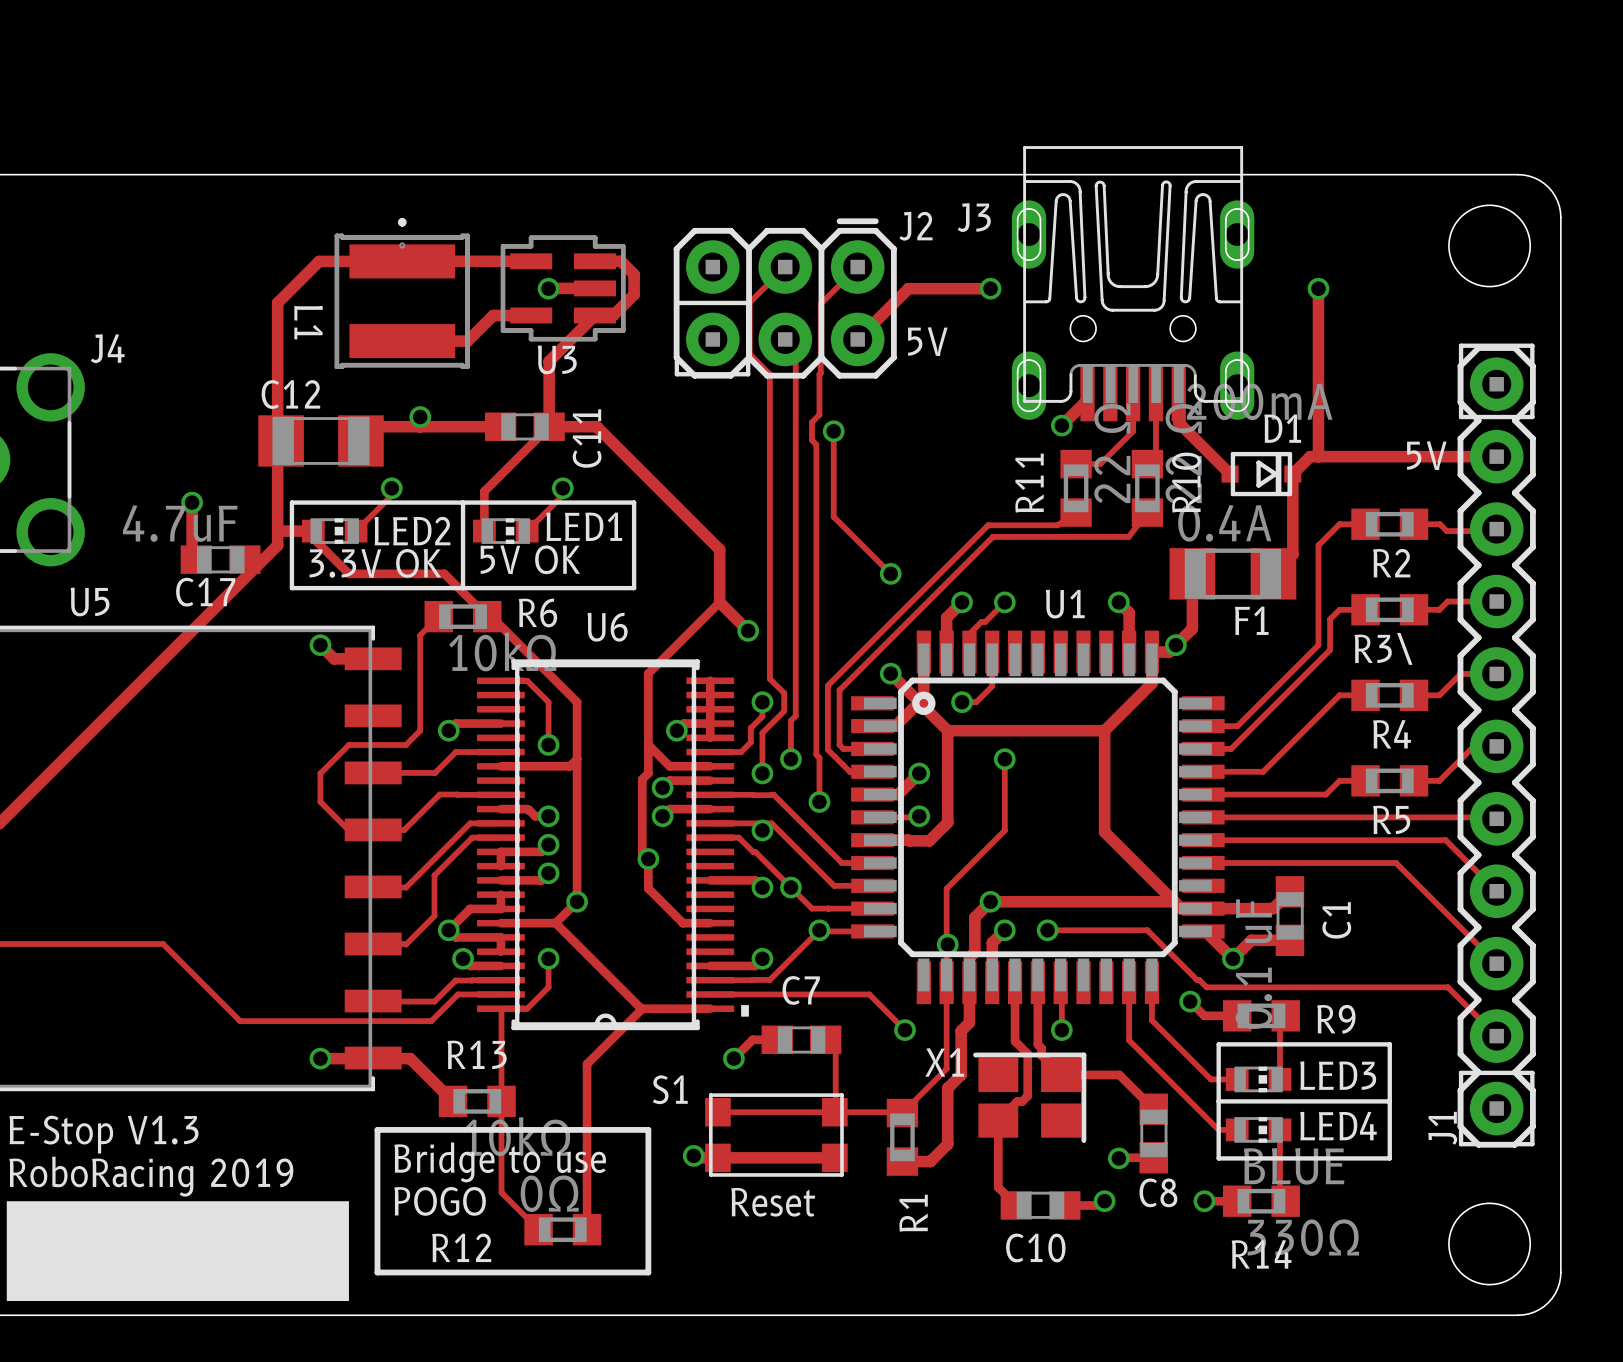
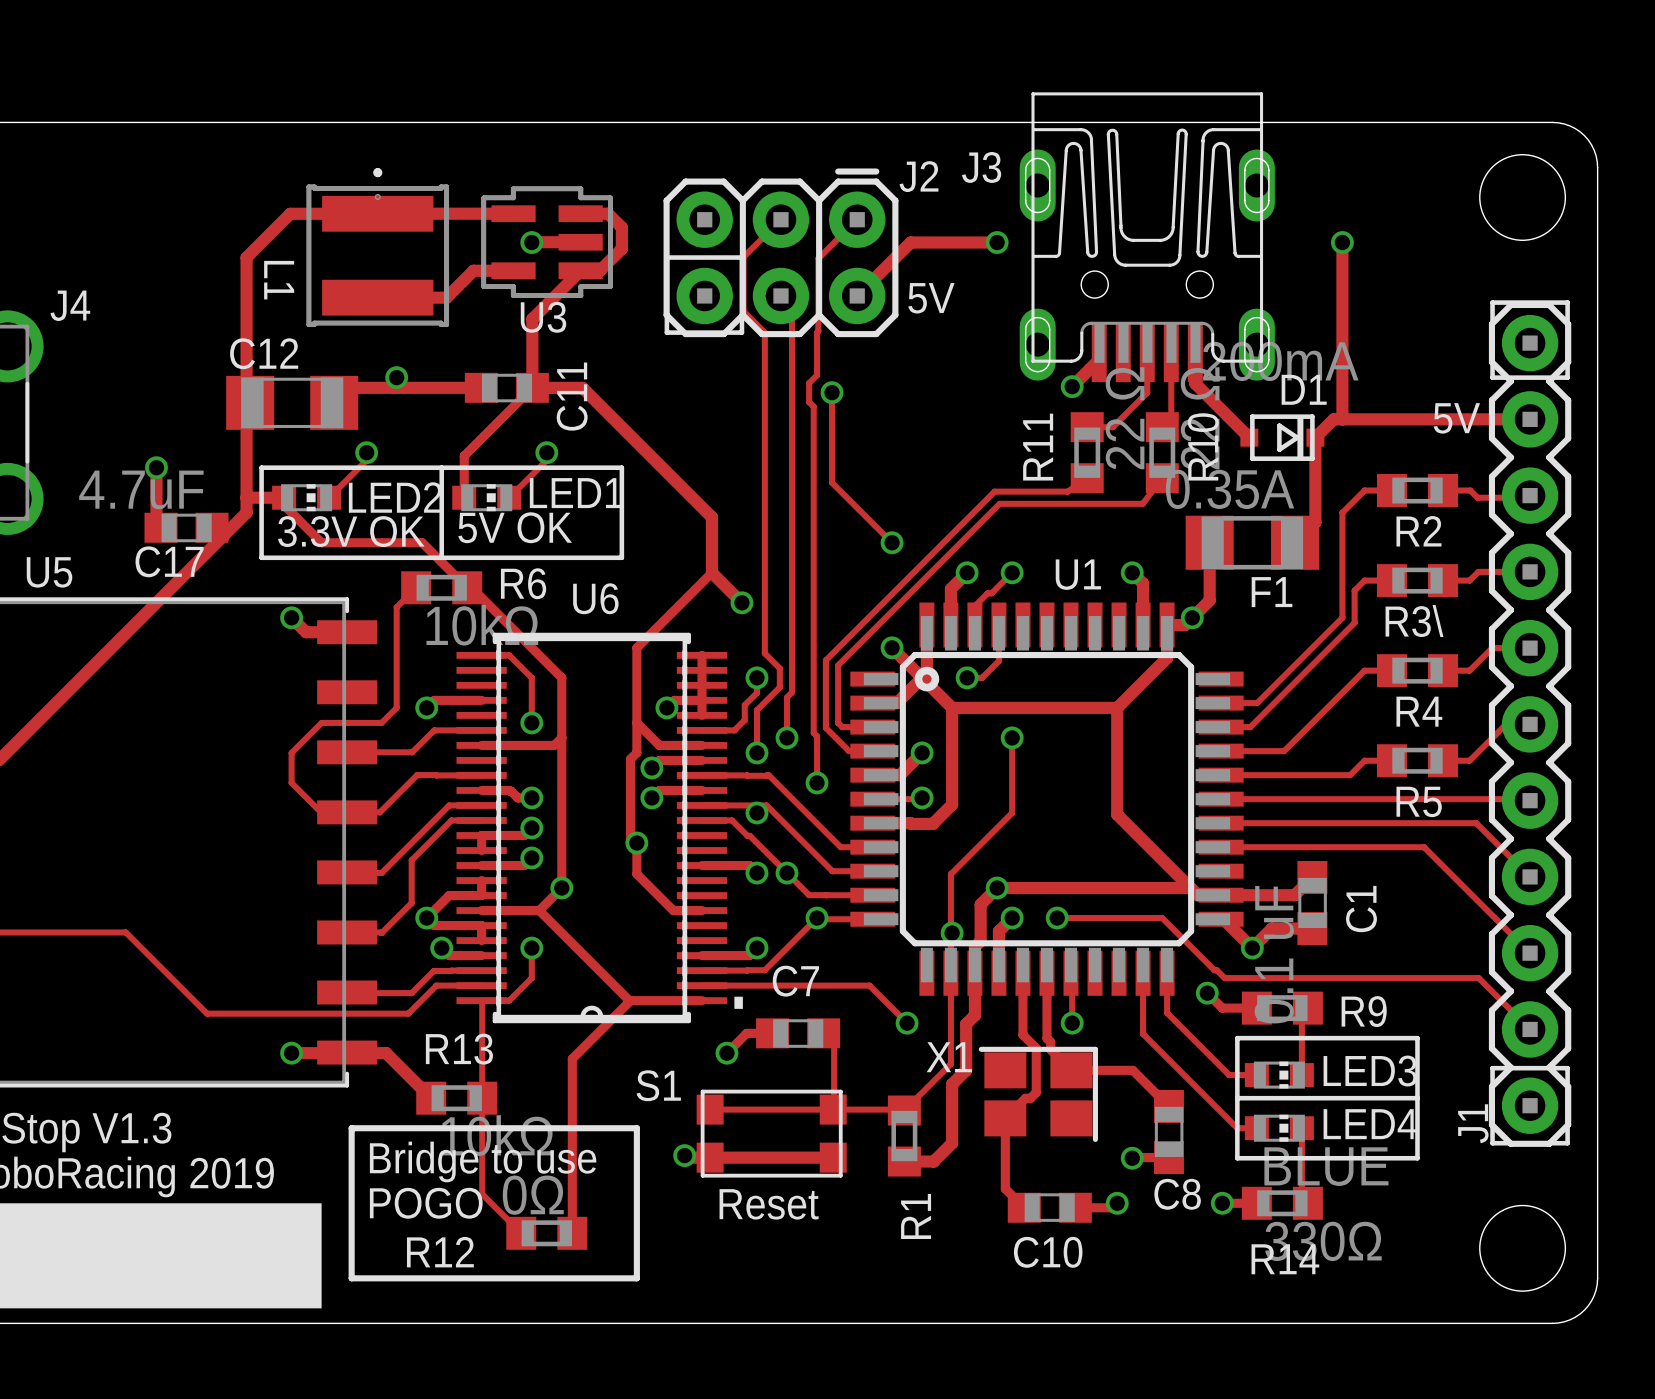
F1 value: 0.4A (1224, 523) -> 0.35A (1230, 489)

